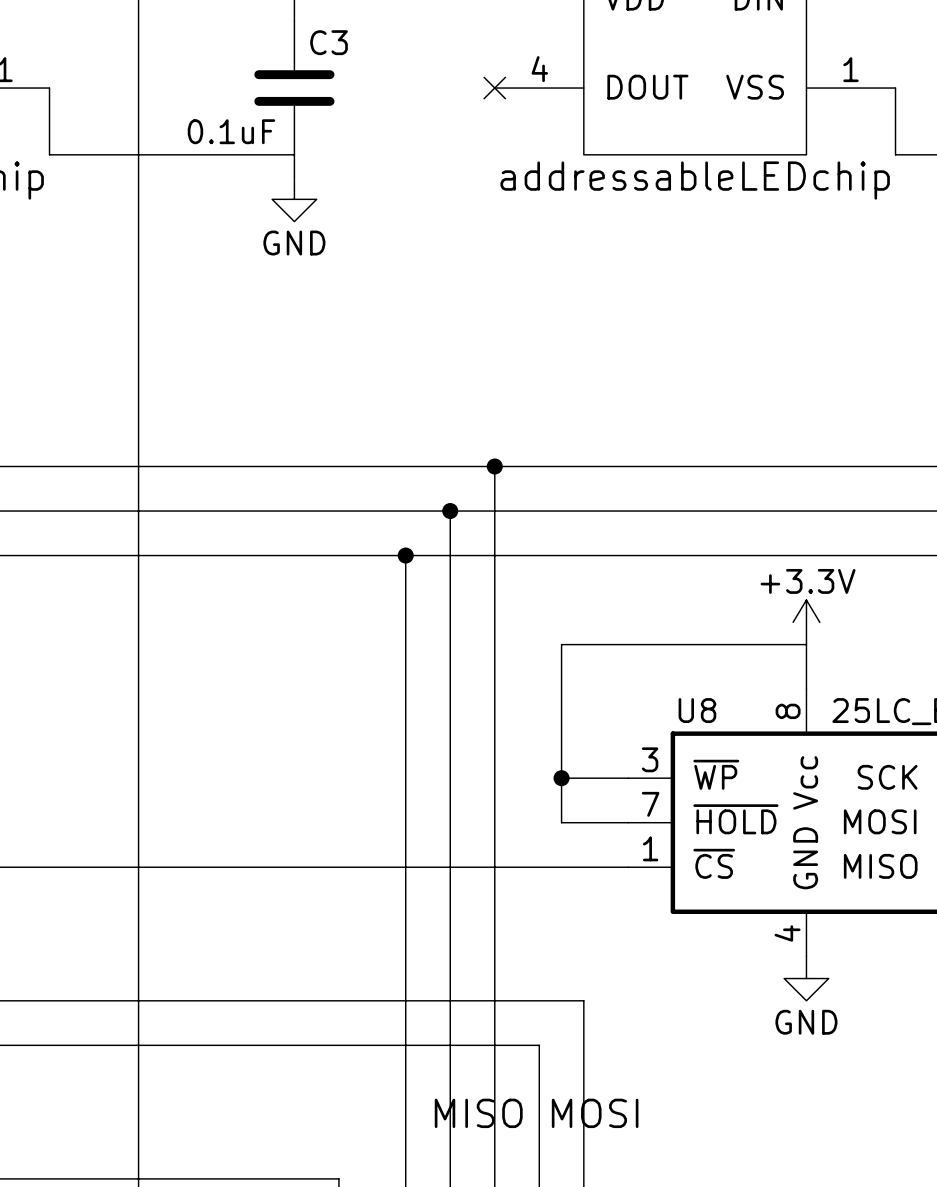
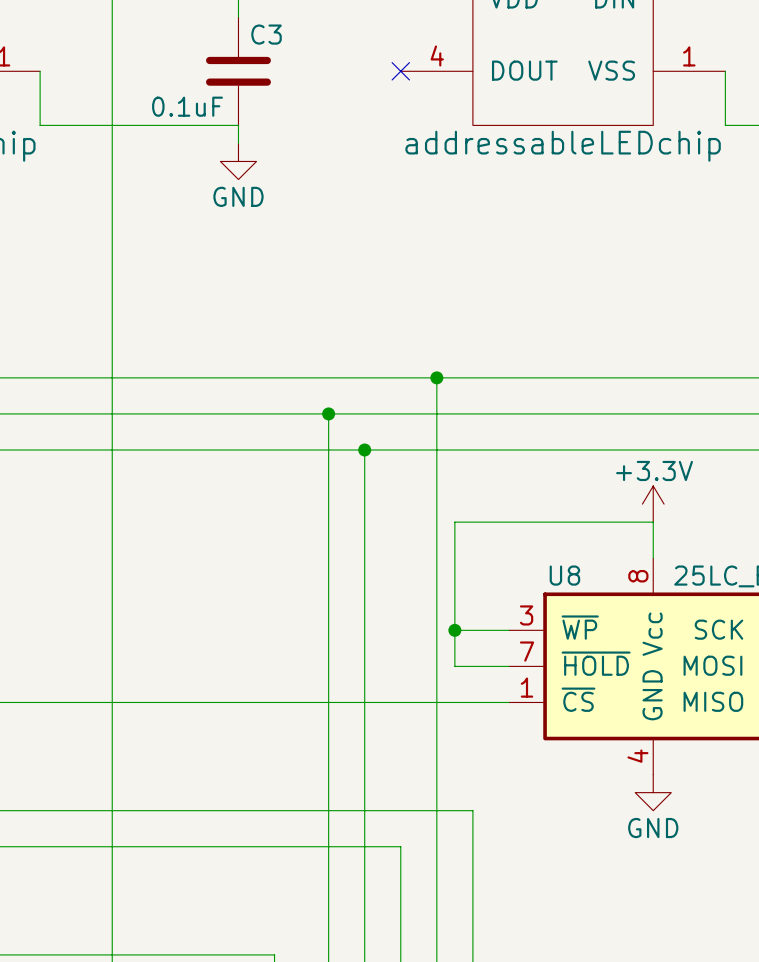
wire: (494, 466) (494, 1045) (539, 1045) -> (436, 377) (436, 846)
junction position: (494, 466) -> (436, 377)
junction: none -> (328, 413)
wire: (450, 511) (450, 555) -> (328, 413) (328, 450)
junction: (450, 511) -> none
junction: (405, 555) -> none
junction: none -> (364, 450)
text: MISO MOSI (536, 1113) -> none

